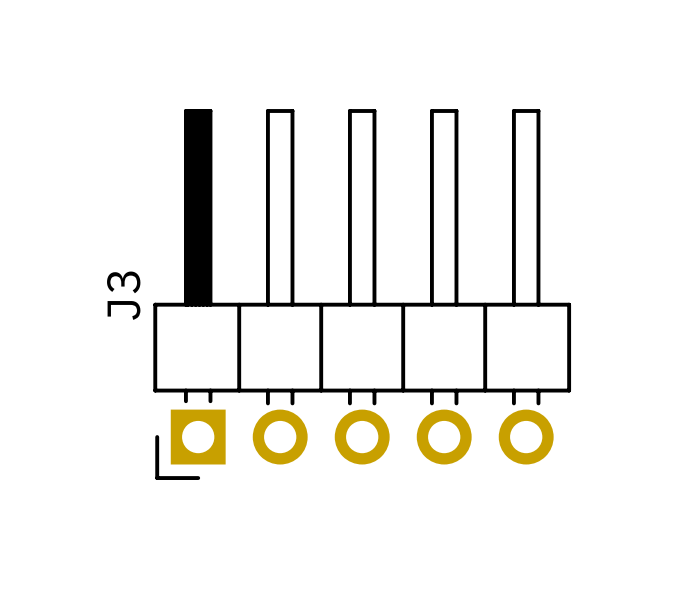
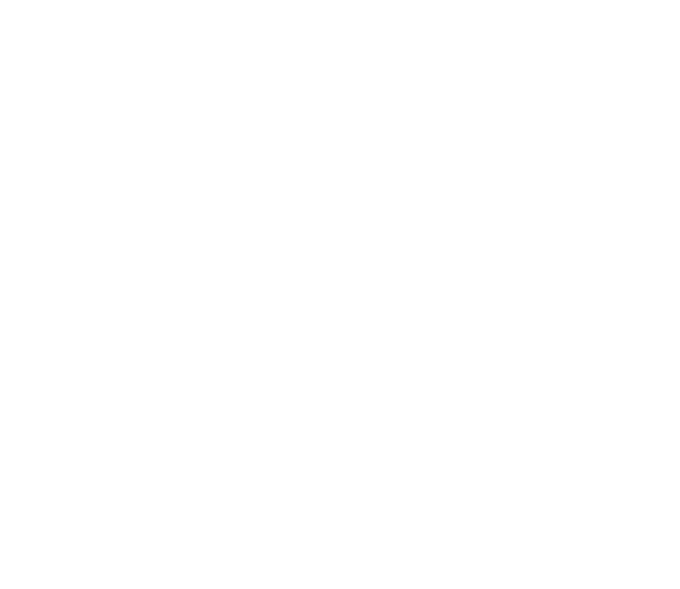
J3: (362, 294) -> none

